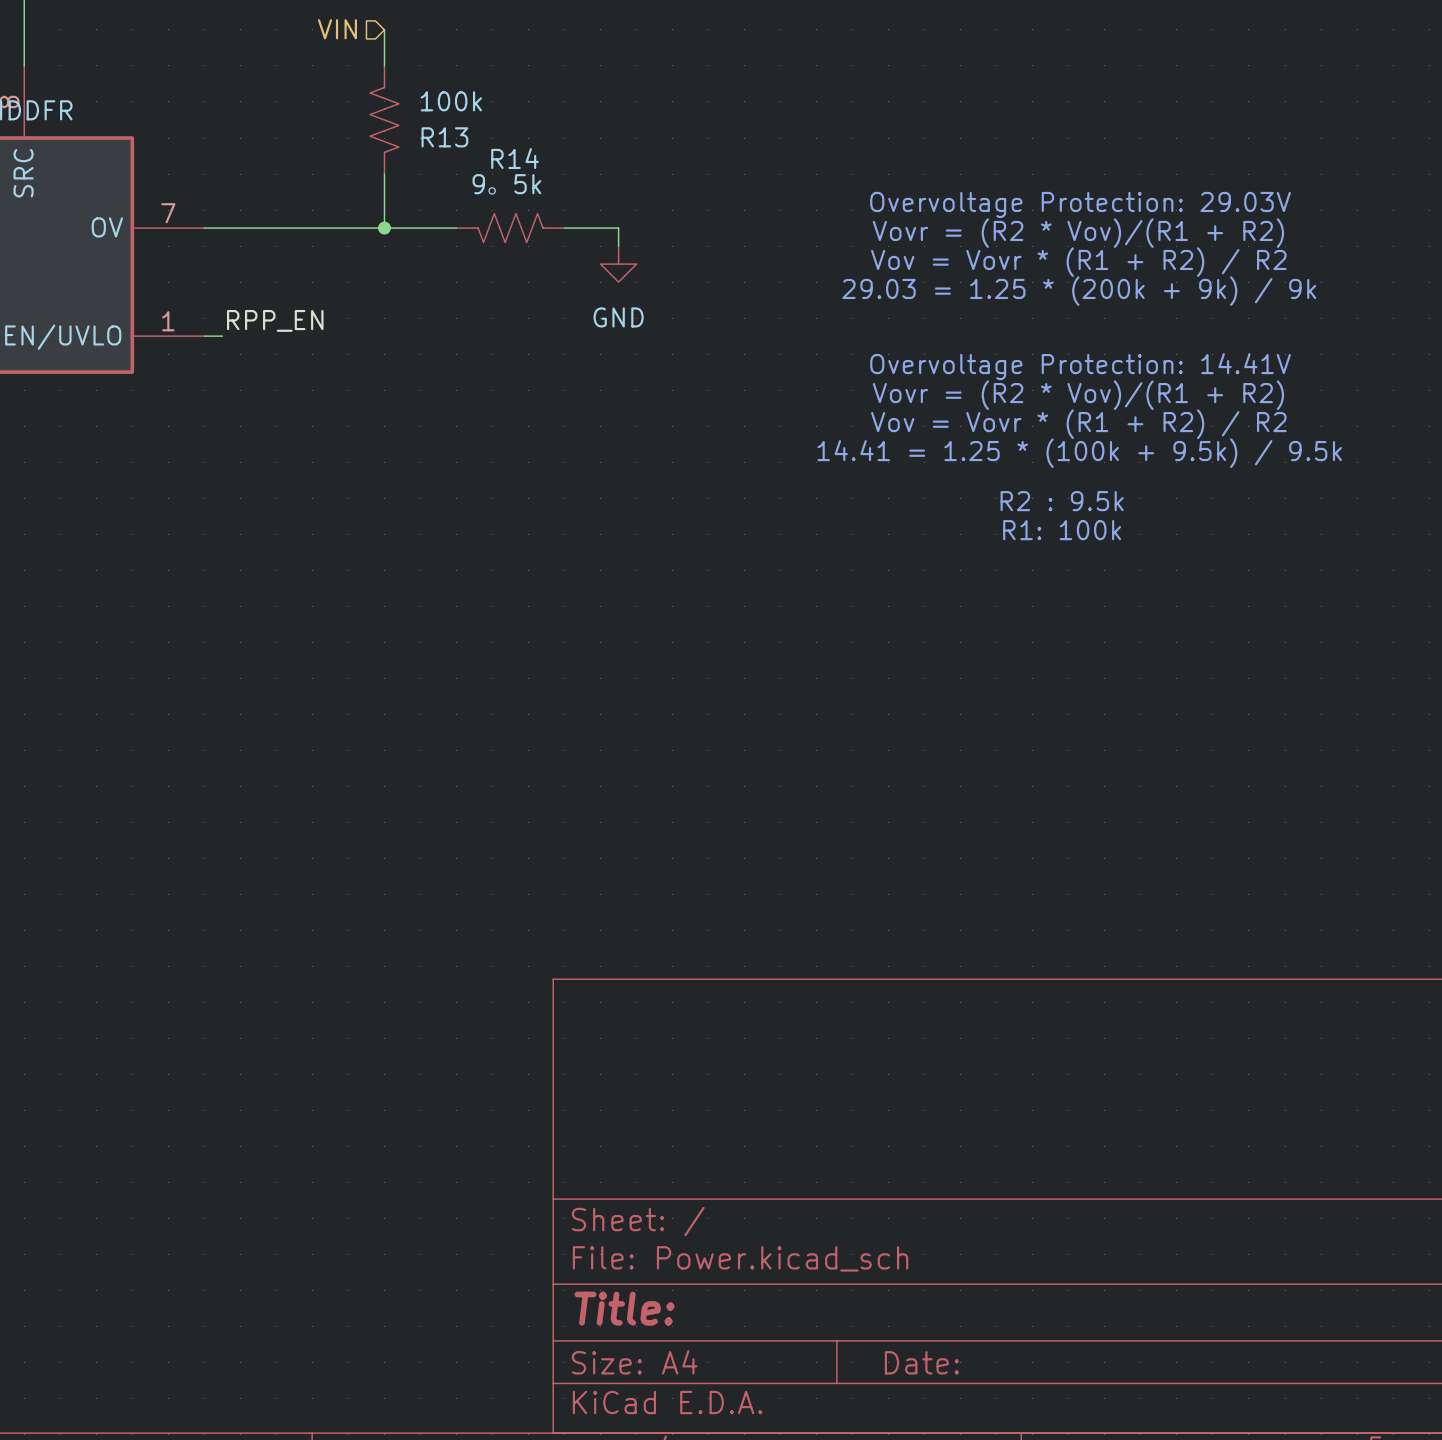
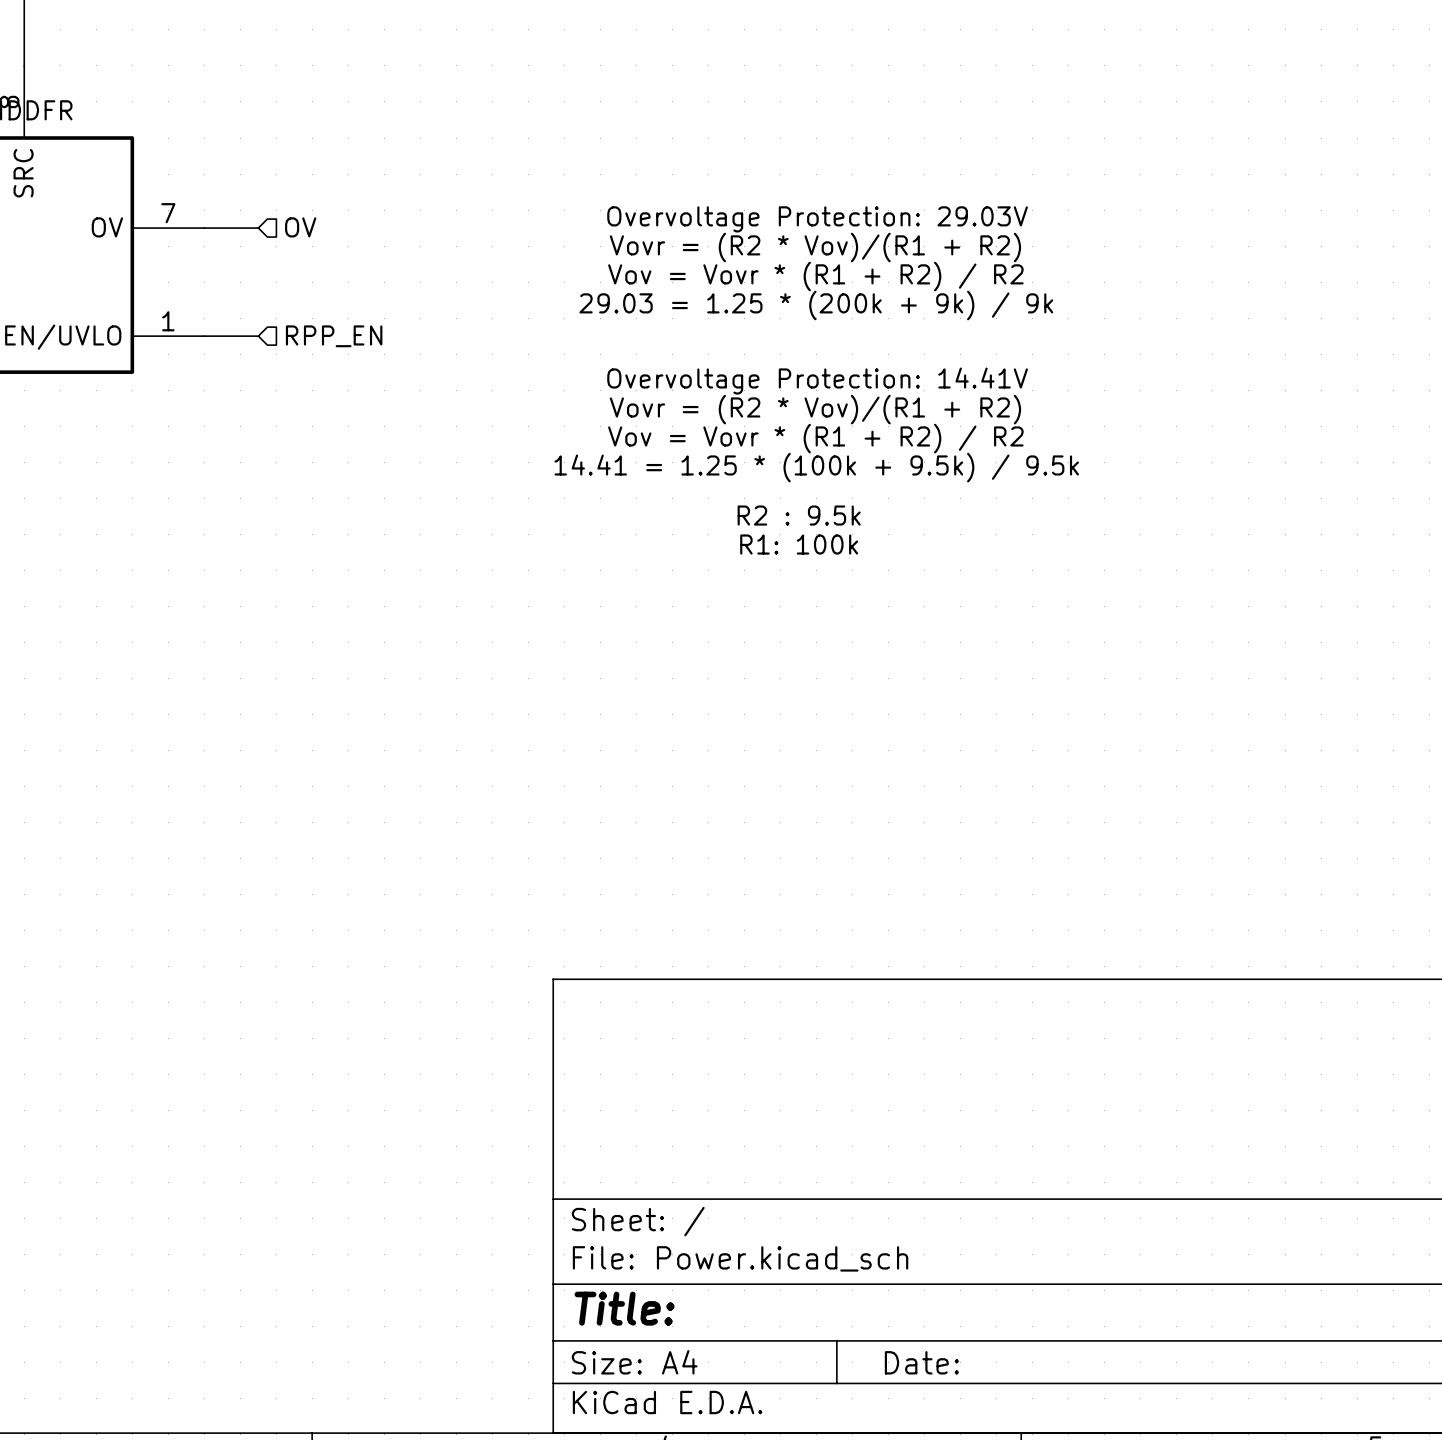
hierarchical label: VIN (337, 29) -> none
wire: (384, 29) (384, 65) -> none
R13: 100k (384, 120) -> none
wire: (384, 174) (384, 228) -> none
text position: Overvoltage Protection: 29.03V (1080, 204) -> Overvoltage Protection: 29.03V (817, 219)
hierarchical label: none -> OV (300, 227)
wire: (258, 228) (456, 228) -> none
junction: (384, 228) -> none
R14: 9。5k (510, 228) -> none
wire: (564, 228) (618, 228) (618, 246) -> none
text position: Vovr = (R2 * Vov)/(R1 + R2) (1078, 233) -> Vovr = (R2 * Vov)/(R1 + R2) (815, 247)
text position: Vov = Vovr * (R1 + R2) / R2 (1078, 262) -> Vov = Vovr * (R1 + R2) / R2 (815, 276)
power symbol: GND (618, 264) -> none
text position: 29.03 = 1.25 * (200k + 9k) / 9k (1079, 291) -> 29.03 = 1.25 * (200k + 9k) / 9k (816, 305)
label: RPP_EN (275, 320) -> none
wire: none -> (222, 336) (258, 336)
hierarchical label: none -> RPP_EN (334, 336)
text position: Overvoltage Protection: 14.41V (1080, 366) -> Overvoltage Protection: 14.41V (817, 381)
text position: Vovr = (R2 * Vov)/(R1 + R2) (1078, 395) -> Vovr = (R2 * Vov)/(R1 + R2) (815, 409)
text position: Vov = Vovr * (R1 + R2) / R2 (1078, 424) -> Vov = Vovr * (R1 + R2) / R2 (815, 438)
text position: 14.41 = 1.25 * (100k + 9.5k) / 9.5k (1079, 453) -> 14.41 = 1.25 * (100k + 9.5k) / 9.5k (816, 467)
text position: R2 : 9.5k (1062, 501) -> R2 : 9.5k (799, 515)
text position: R1: 100k (1062, 530) -> R1: 100k (799, 544)

